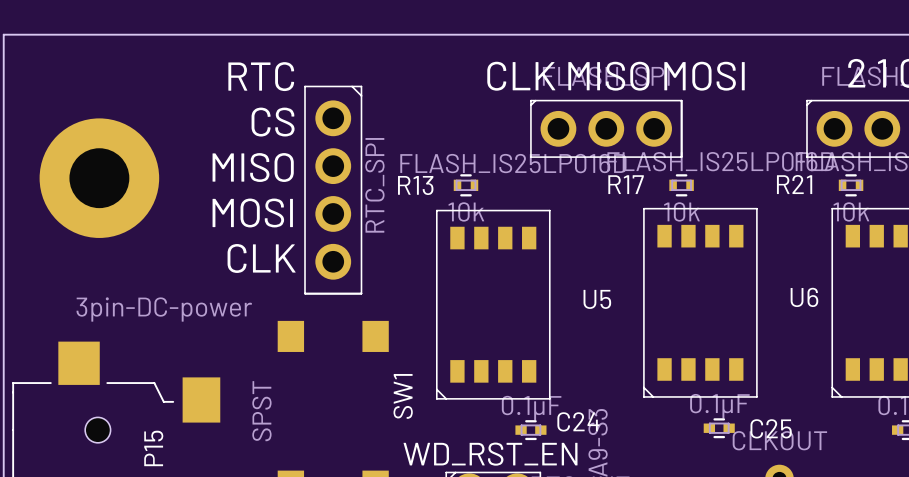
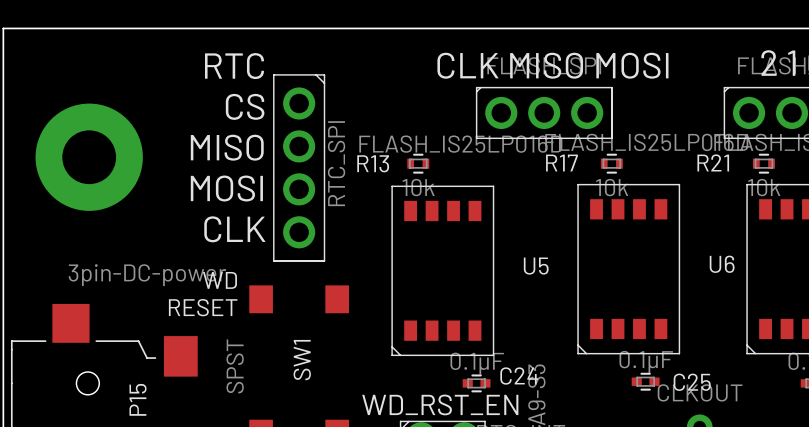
text: none -> WD (219, 280)
text: none -> RESET (203, 307)
SW1 name position: SW1 (403, 396) -> SW1 (302, 360)

